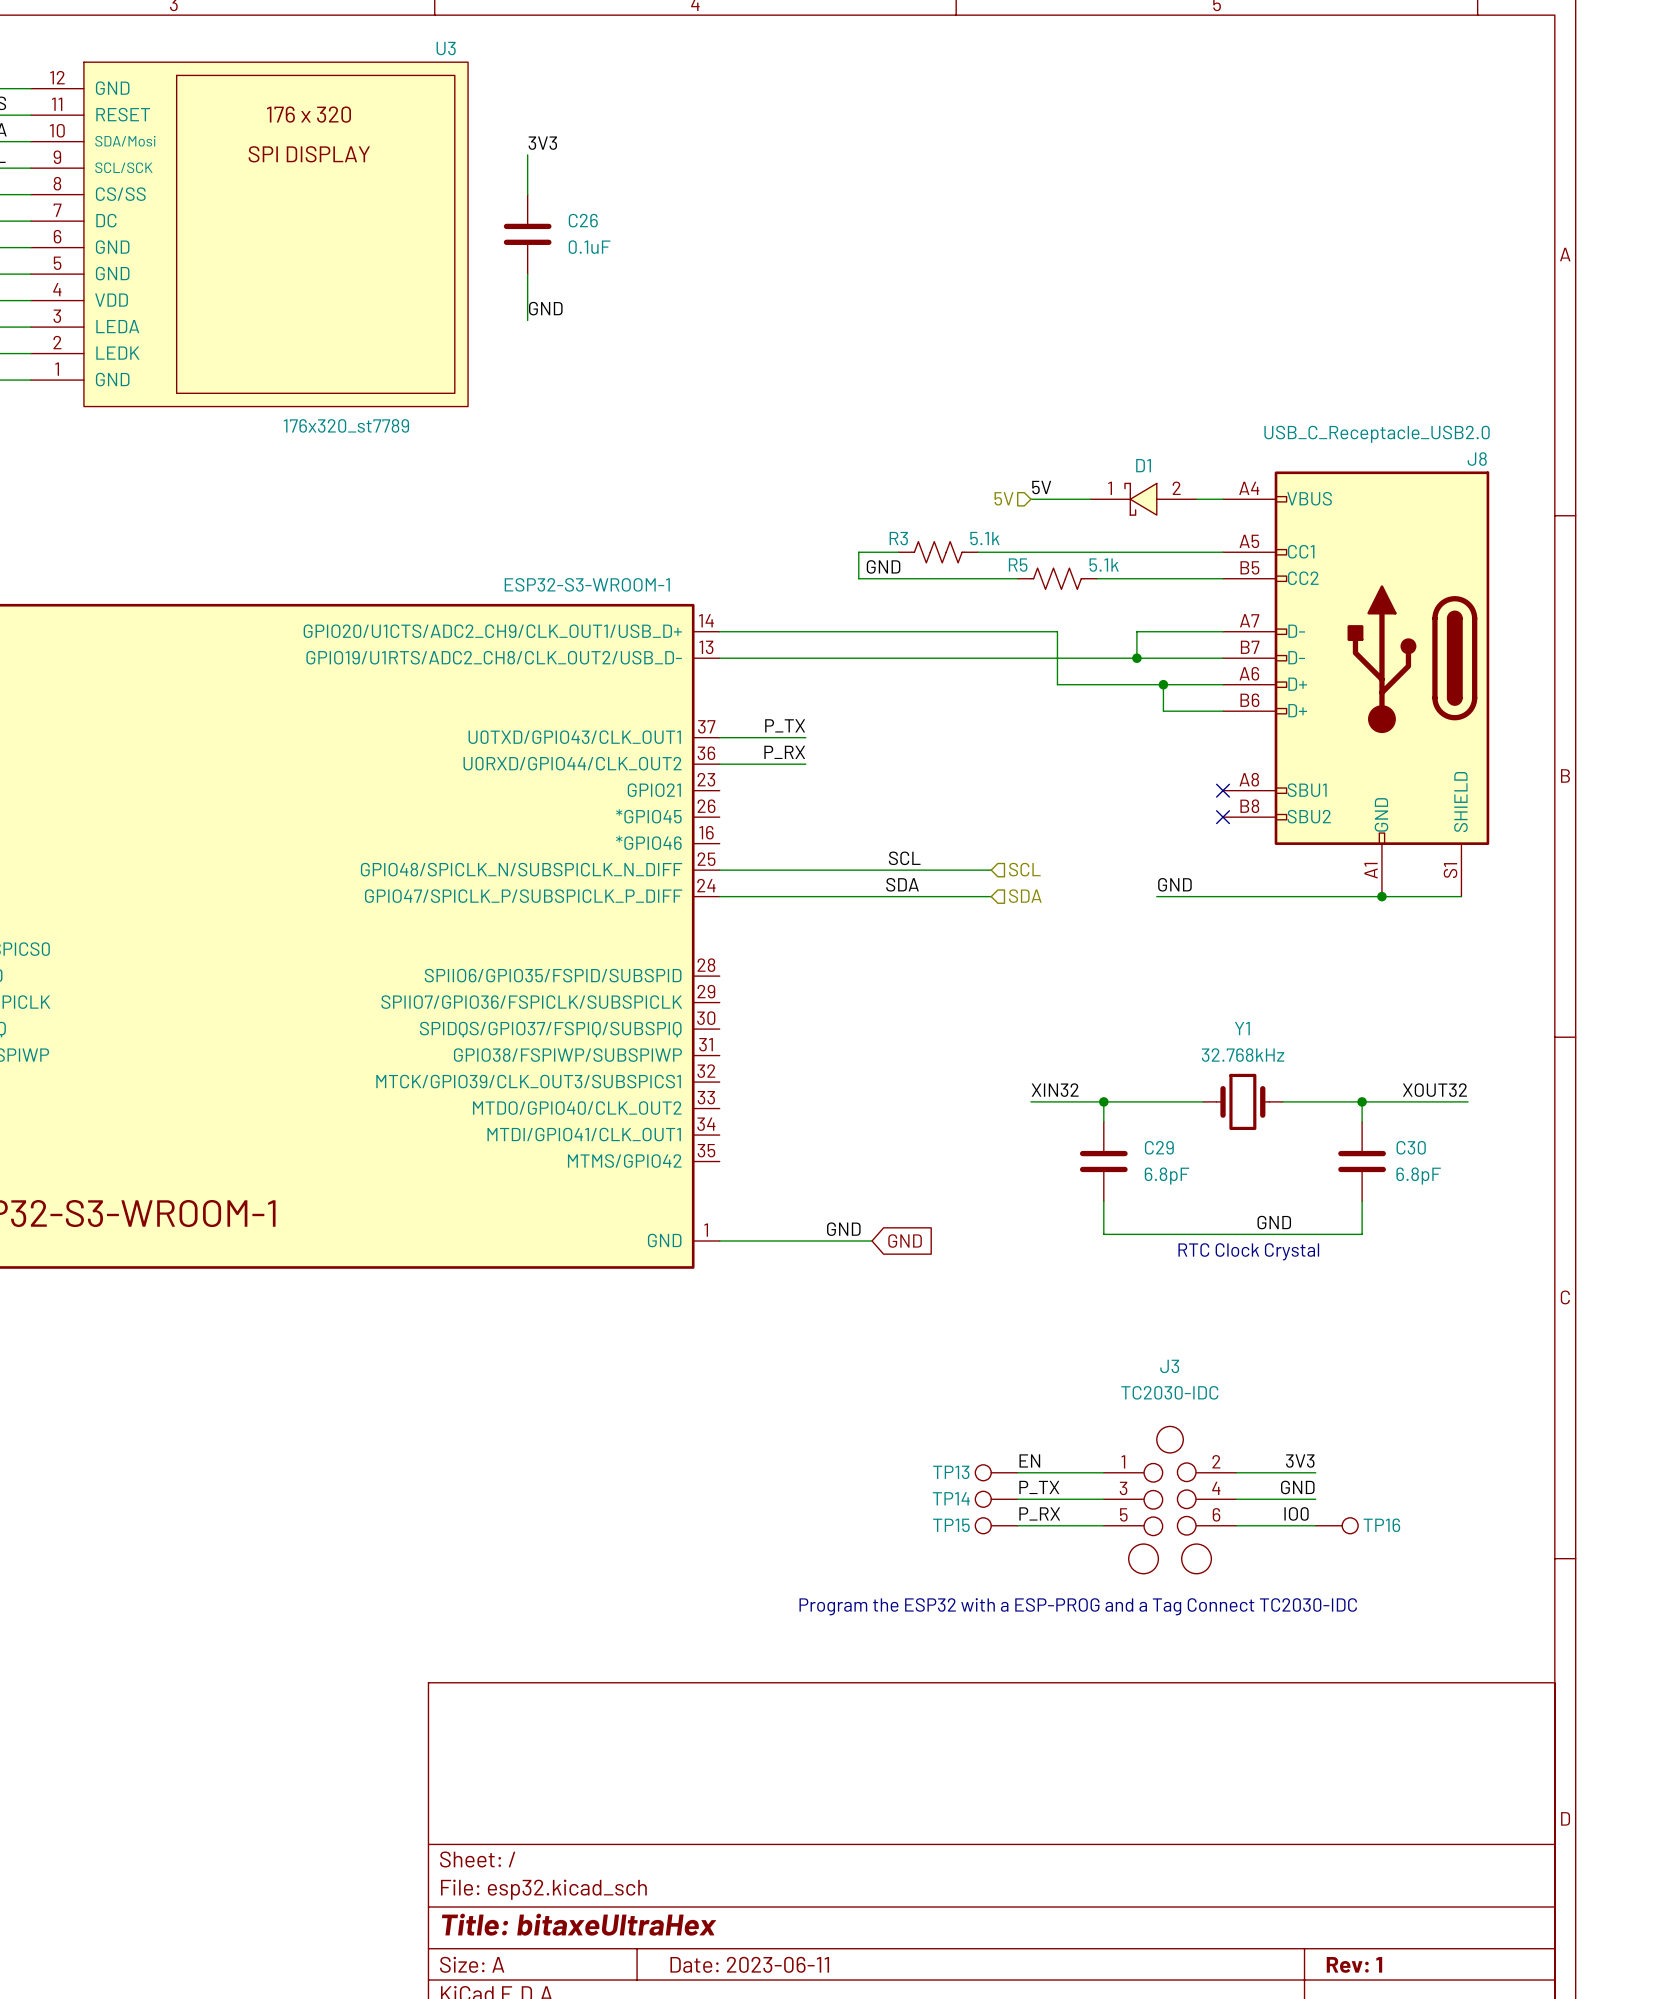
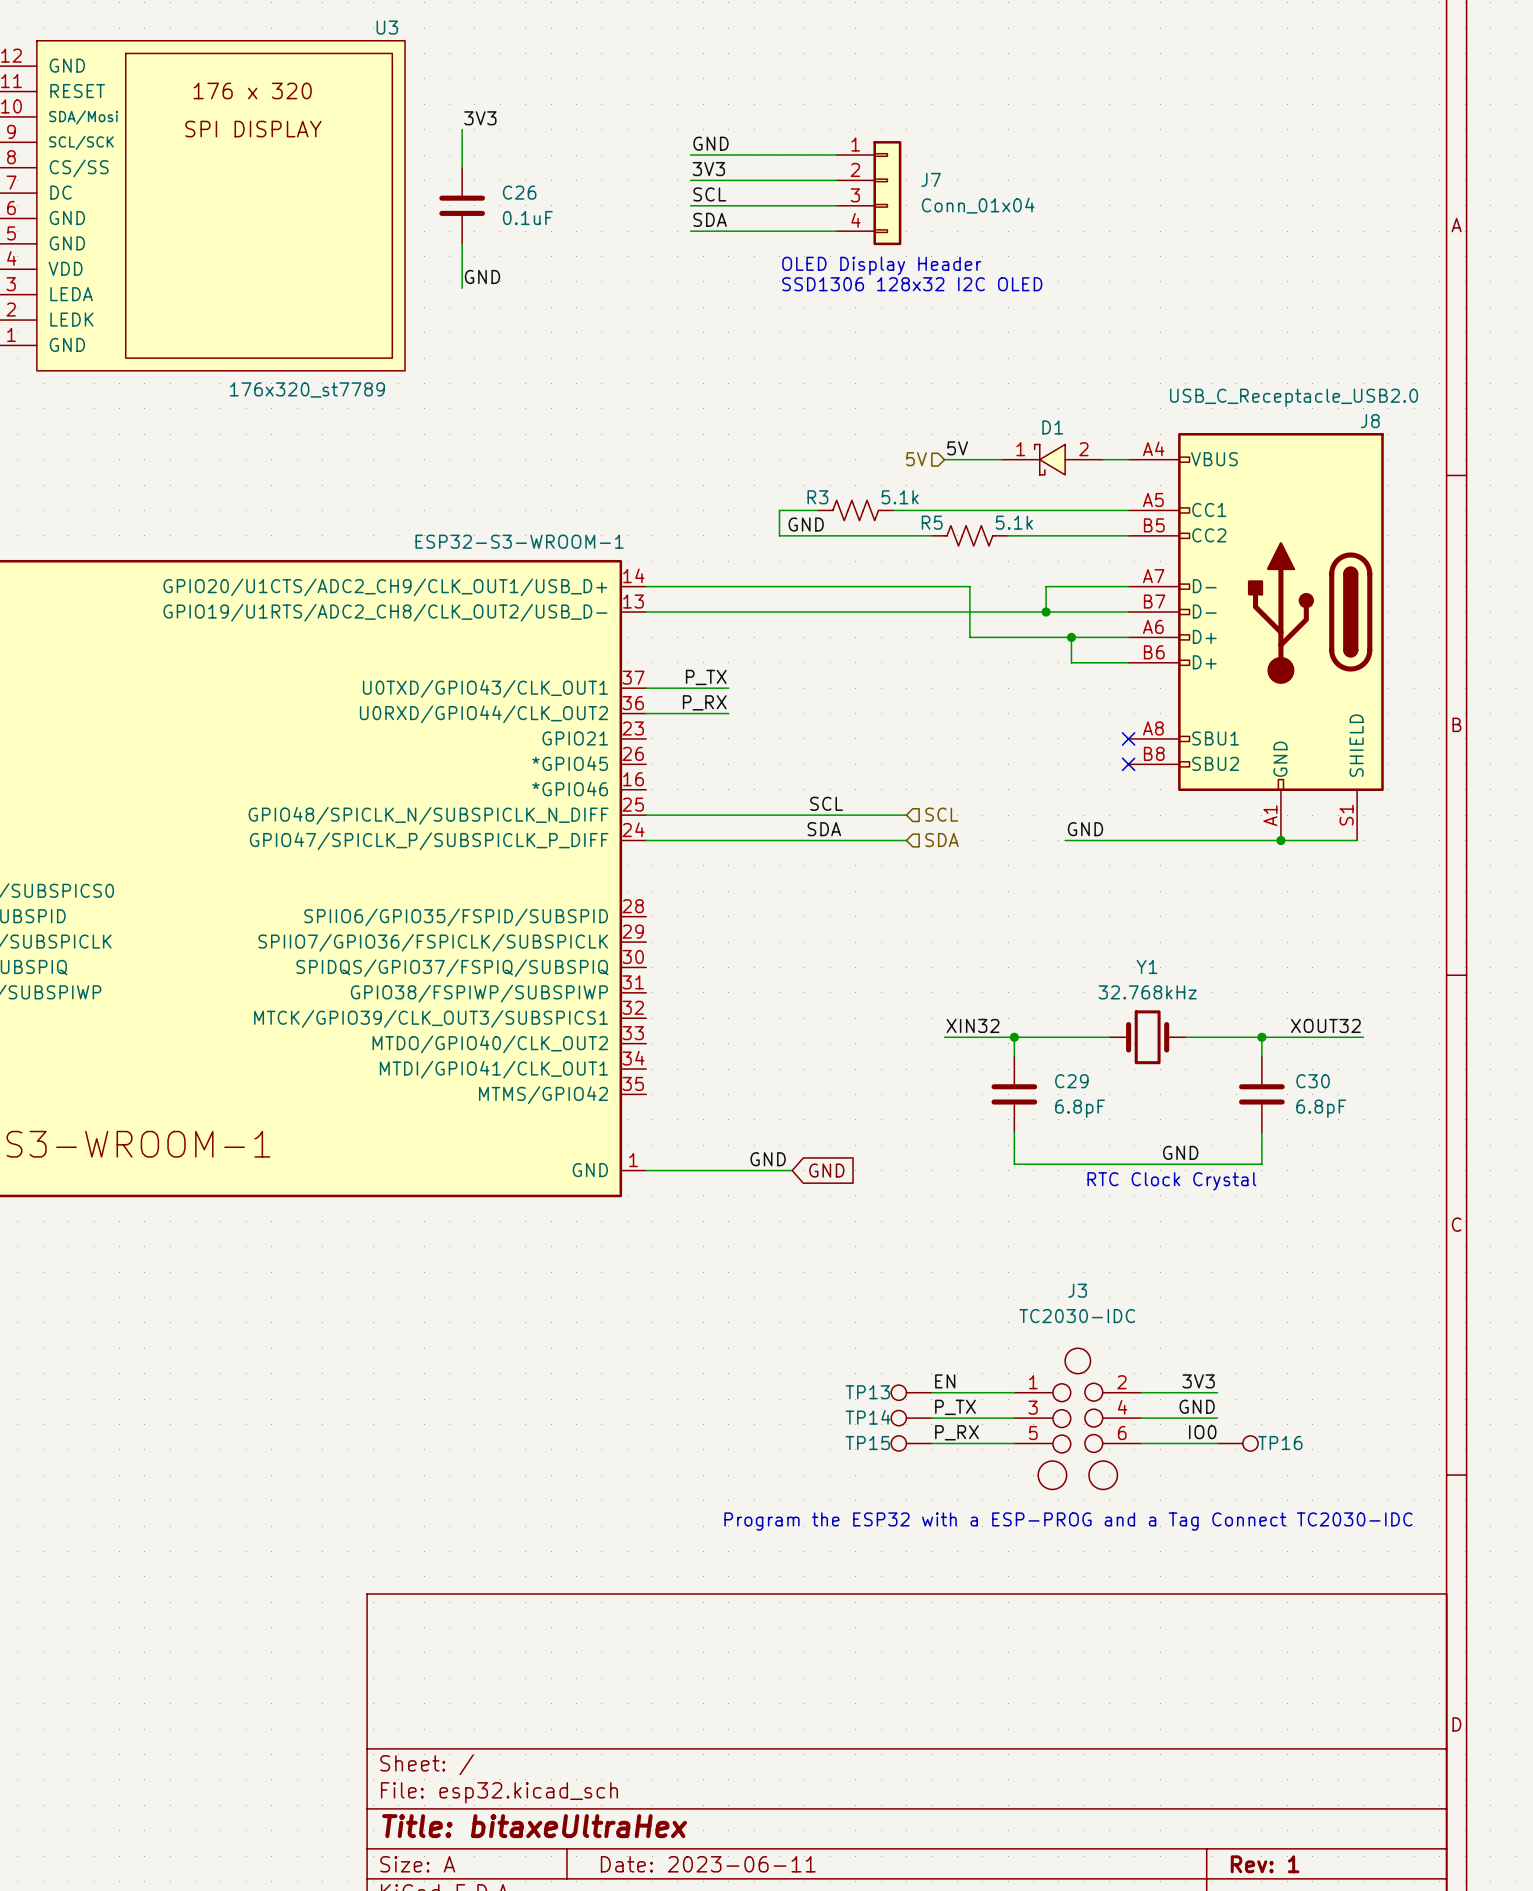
label: none -> GND (710, 143)
wire: none -> (690, 155) (836, 155)
label: none -> 3V3 (708, 169)
wire: none -> (690, 180) (836, 180)
J7: none -> Conn_01x04 (868, 193)
label: none -> SCL (709, 194)
wire: none -> (690, 205) (836, 205)
label: none -> SDA (710, 219)
wire: none -> (690, 231) (836, 231)
text: none -> OLED Display Header (881, 265)
text: none -> SSD1306 128x32 I2C OLED (912, 284)

